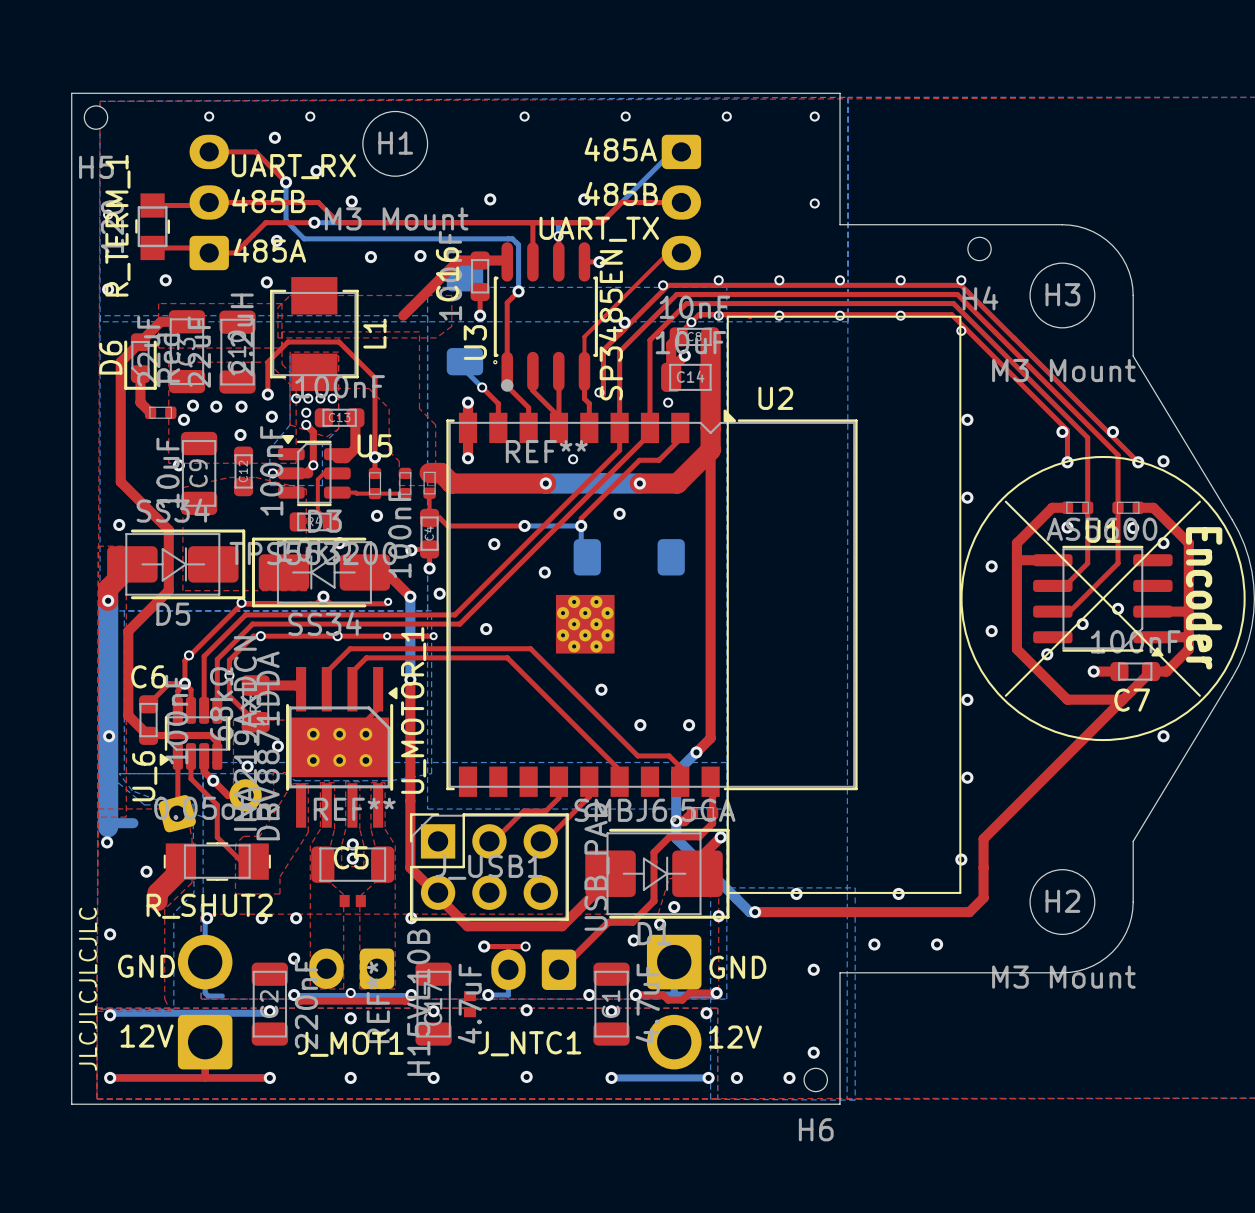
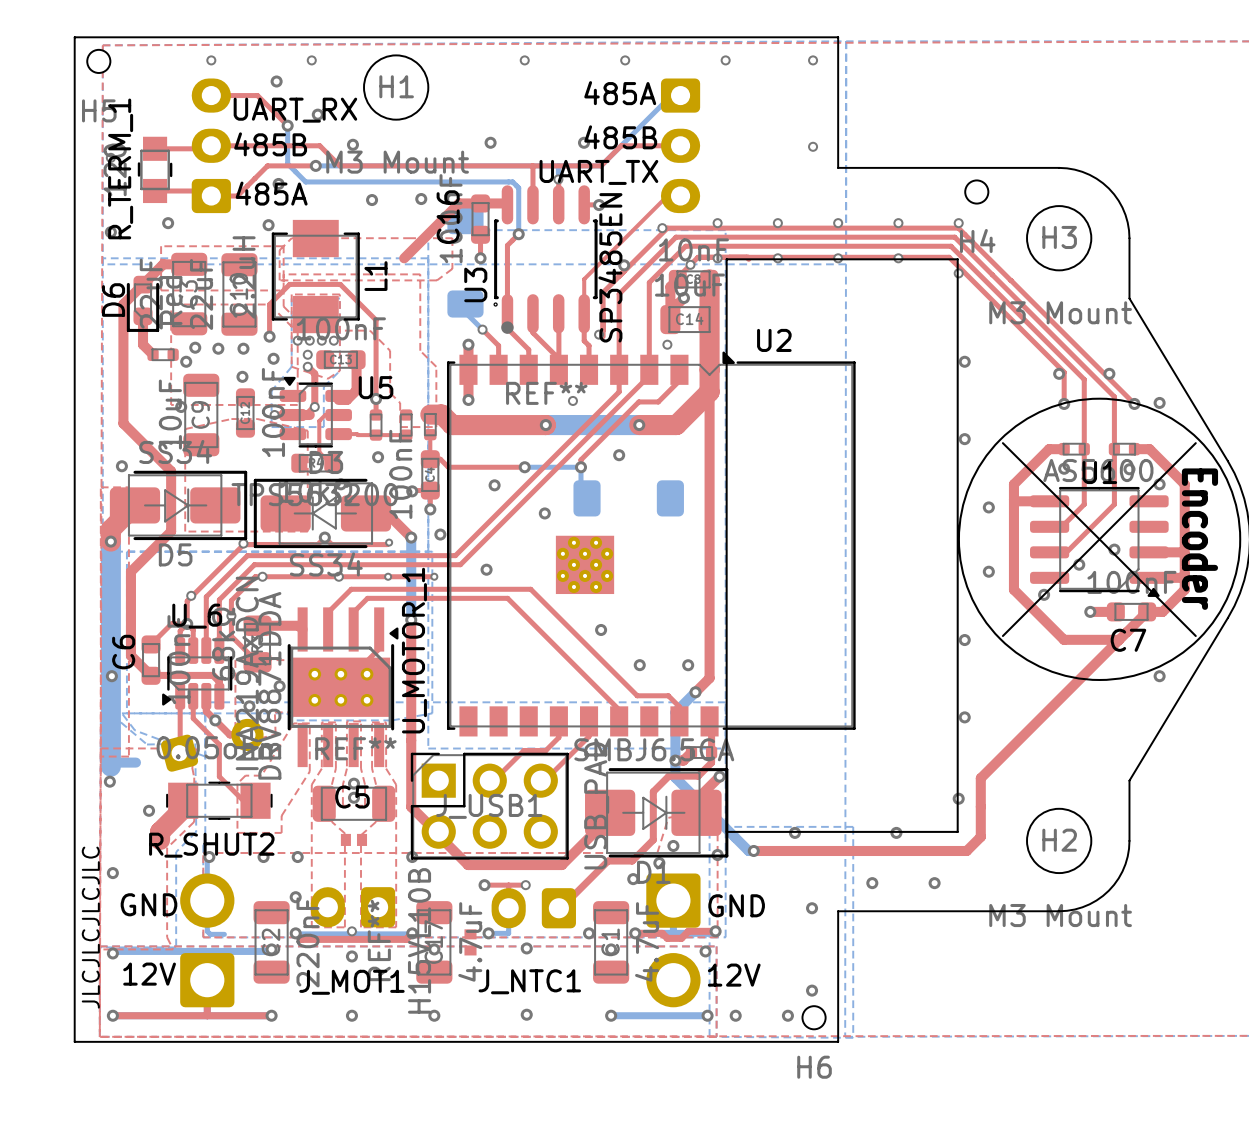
C6 name rotation: 0° (148, 676) -> 90° counterclockwise (123, 652)
U_6 name rotation: 0° (144, 776) -> 90° clockwise (197, 616)
U_6 name position: U_6 (144, 776) -> U_6 (197, 616)

